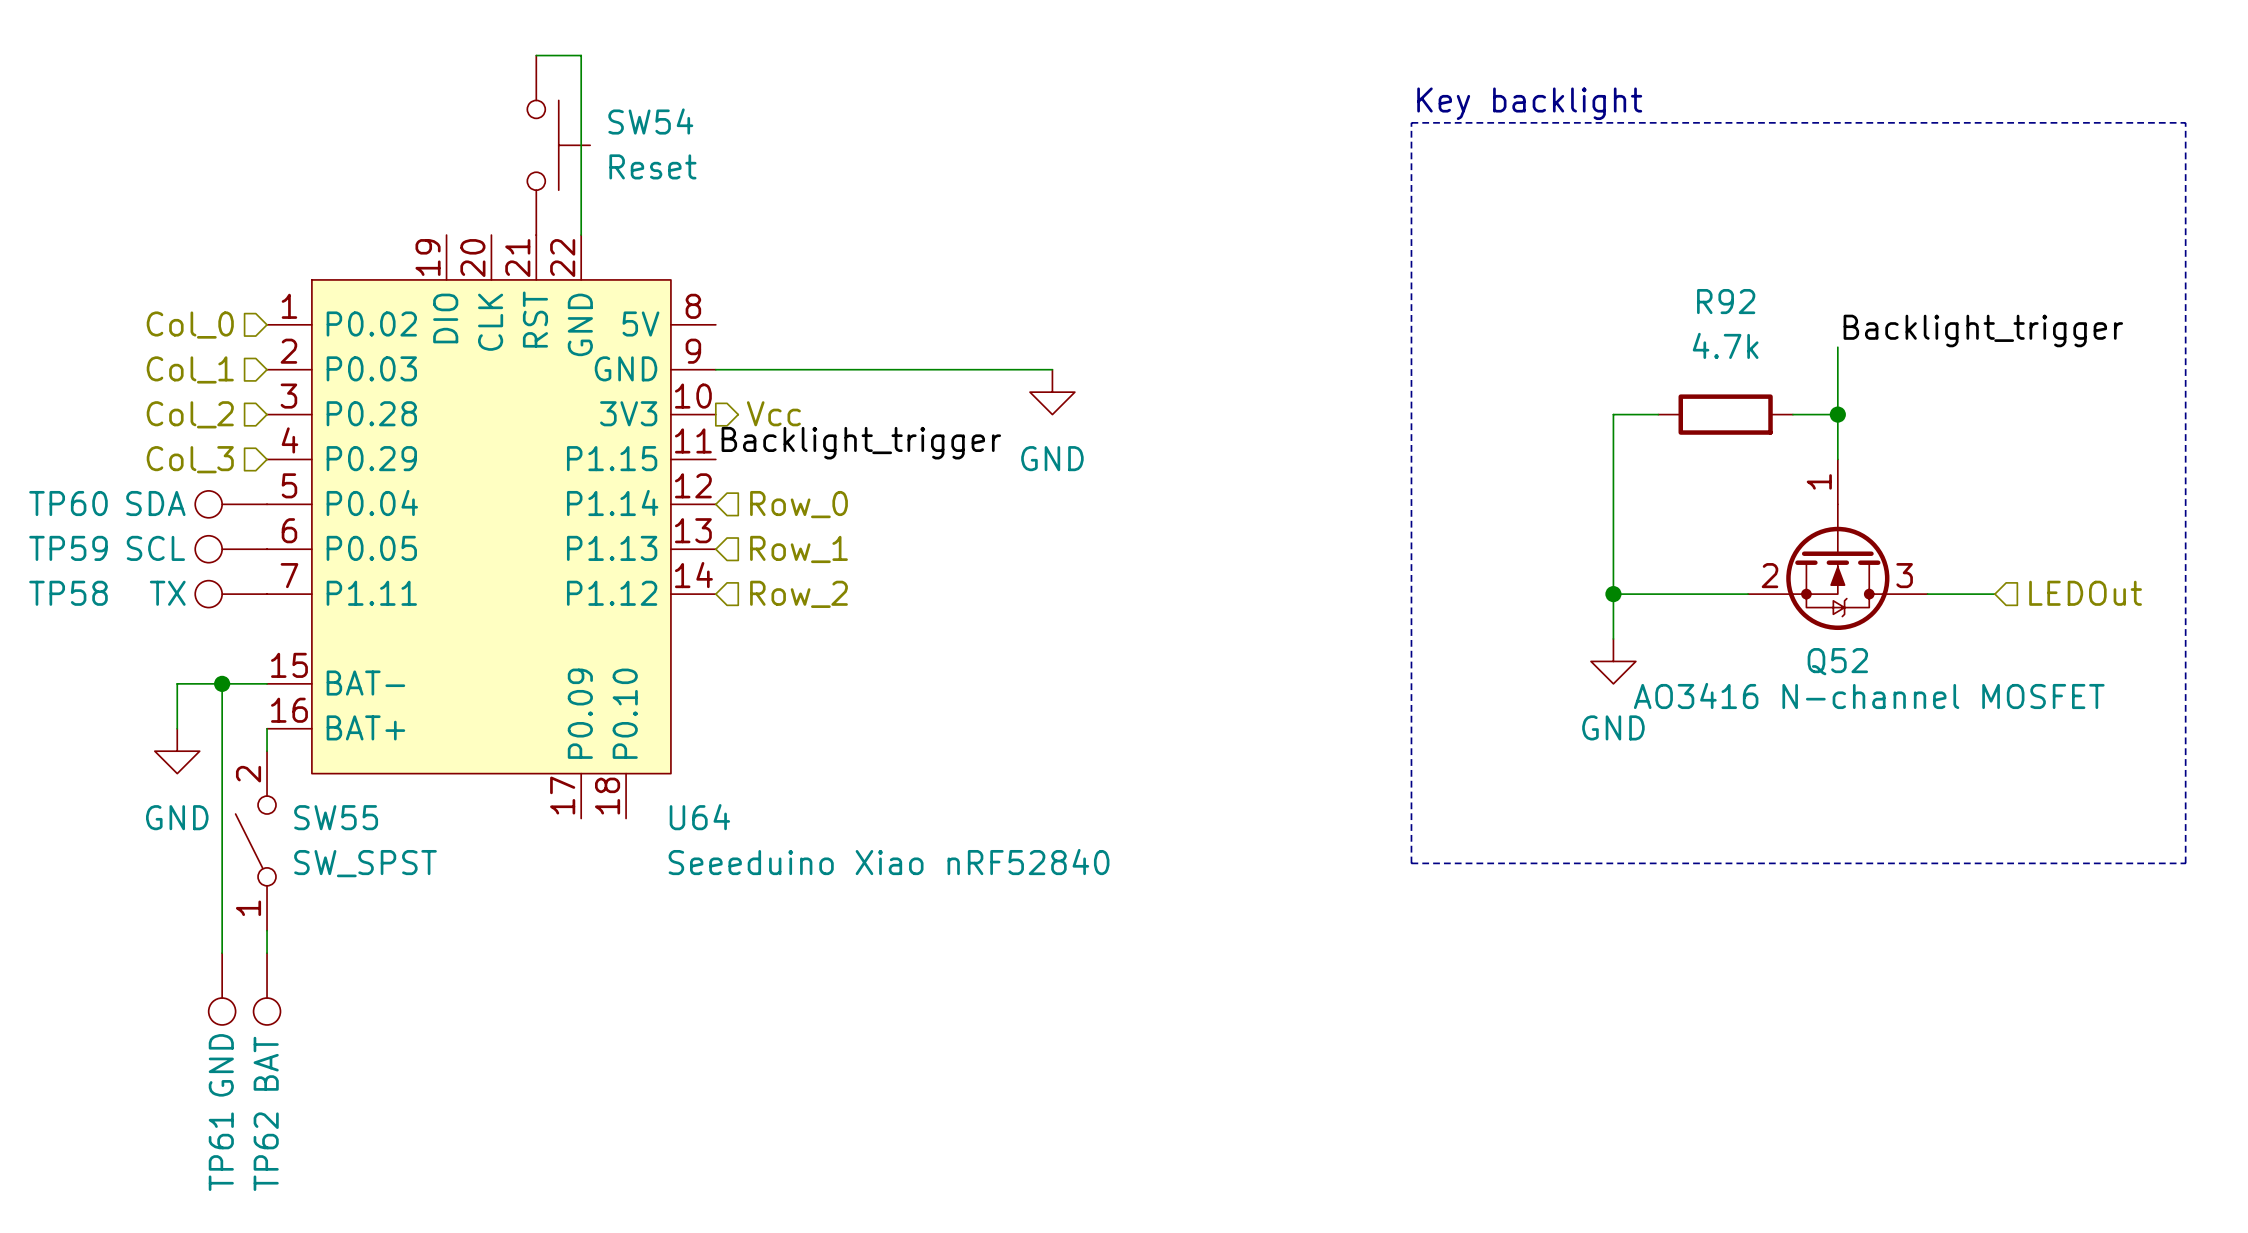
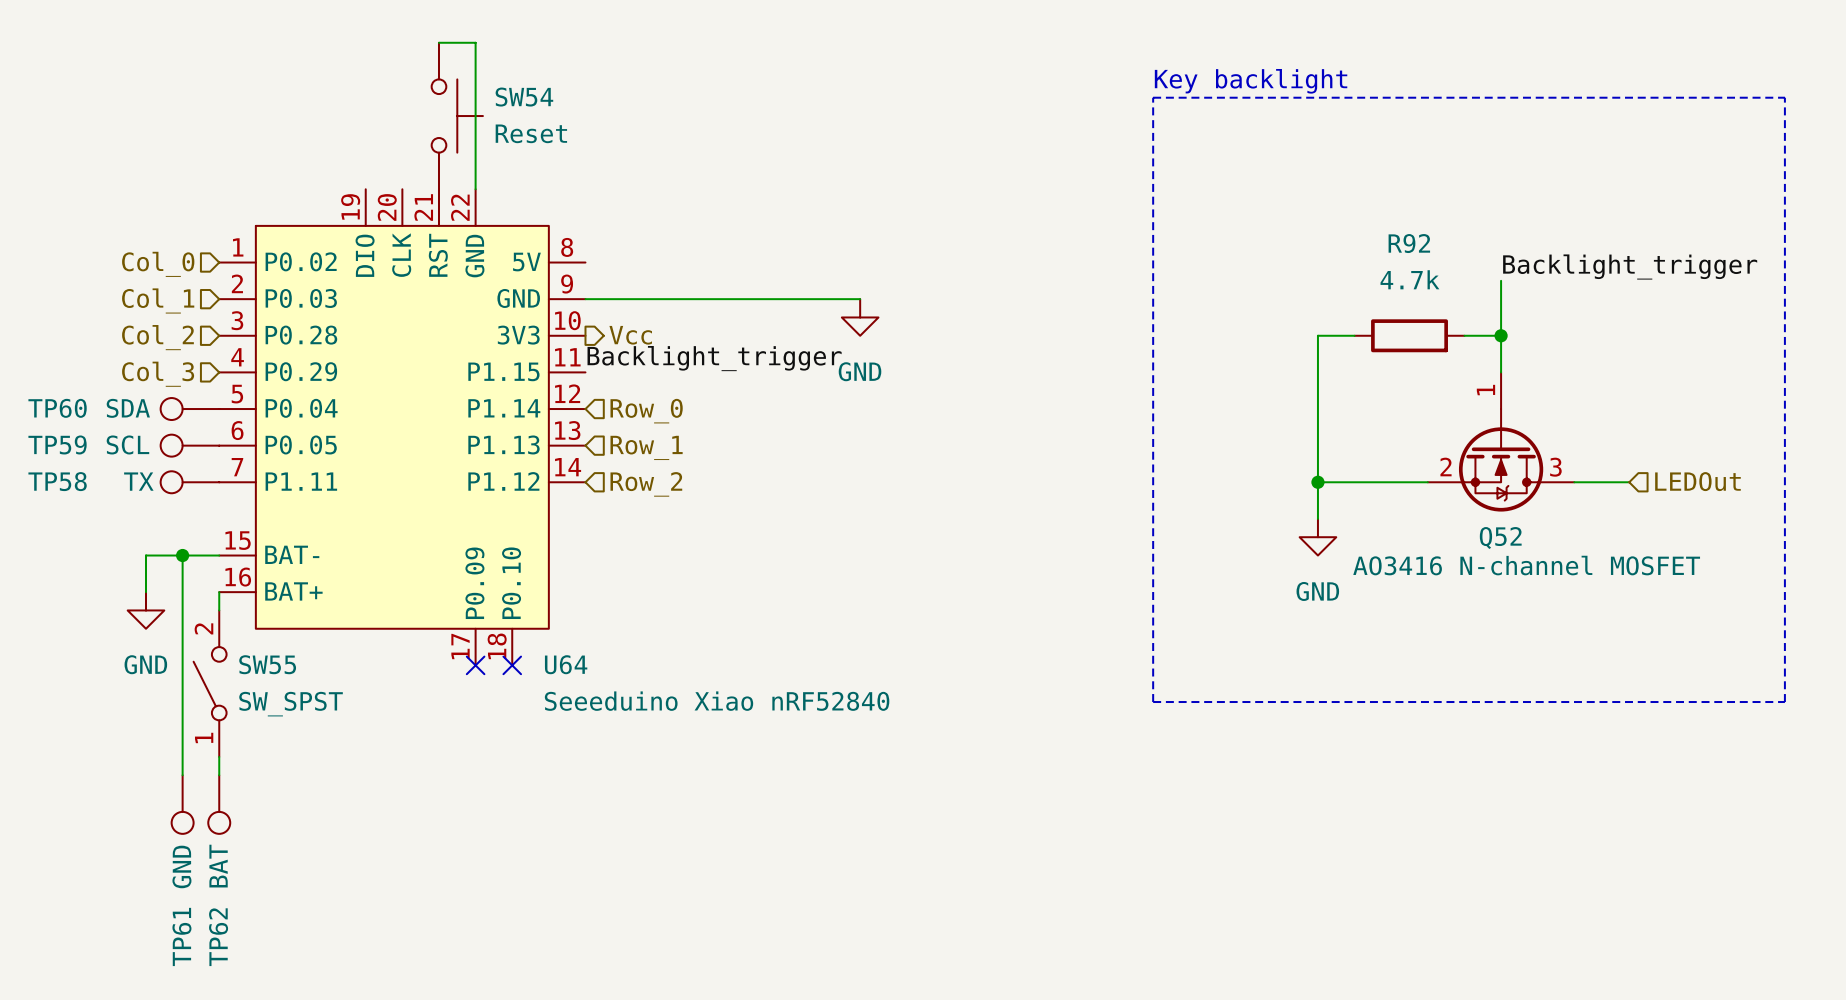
no-connect mark: none -> (475, 665)
no-connect mark: none -> (512, 665)

